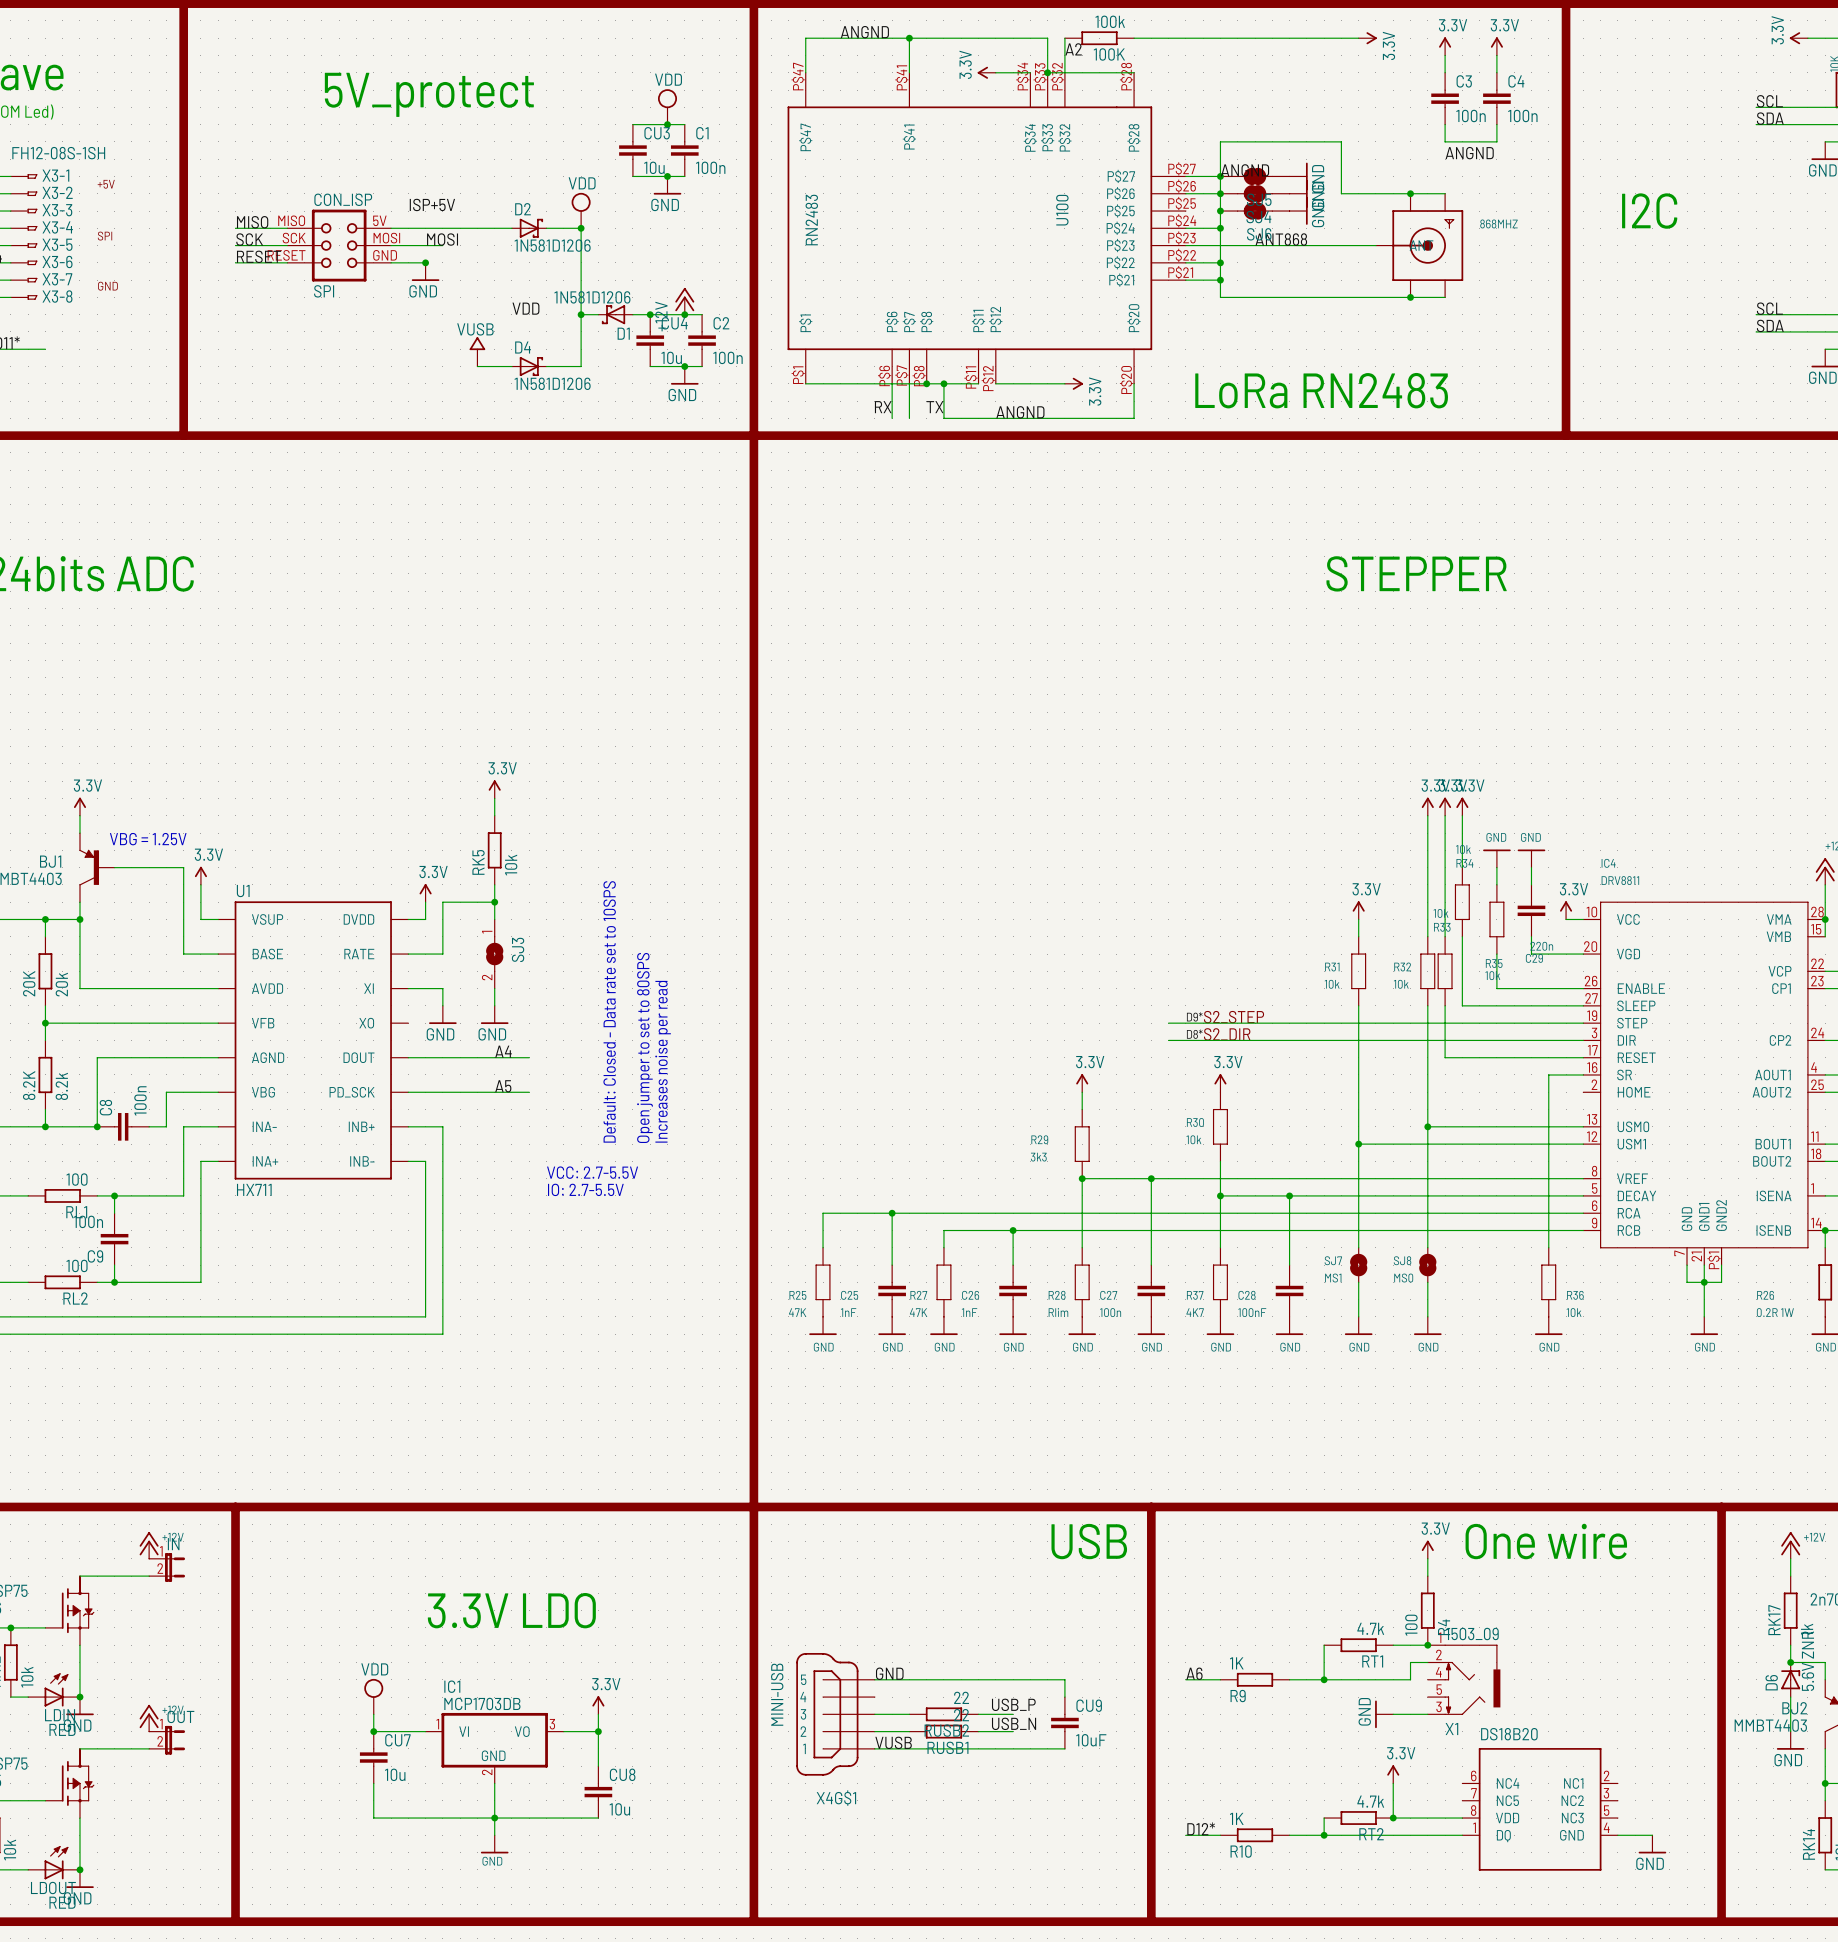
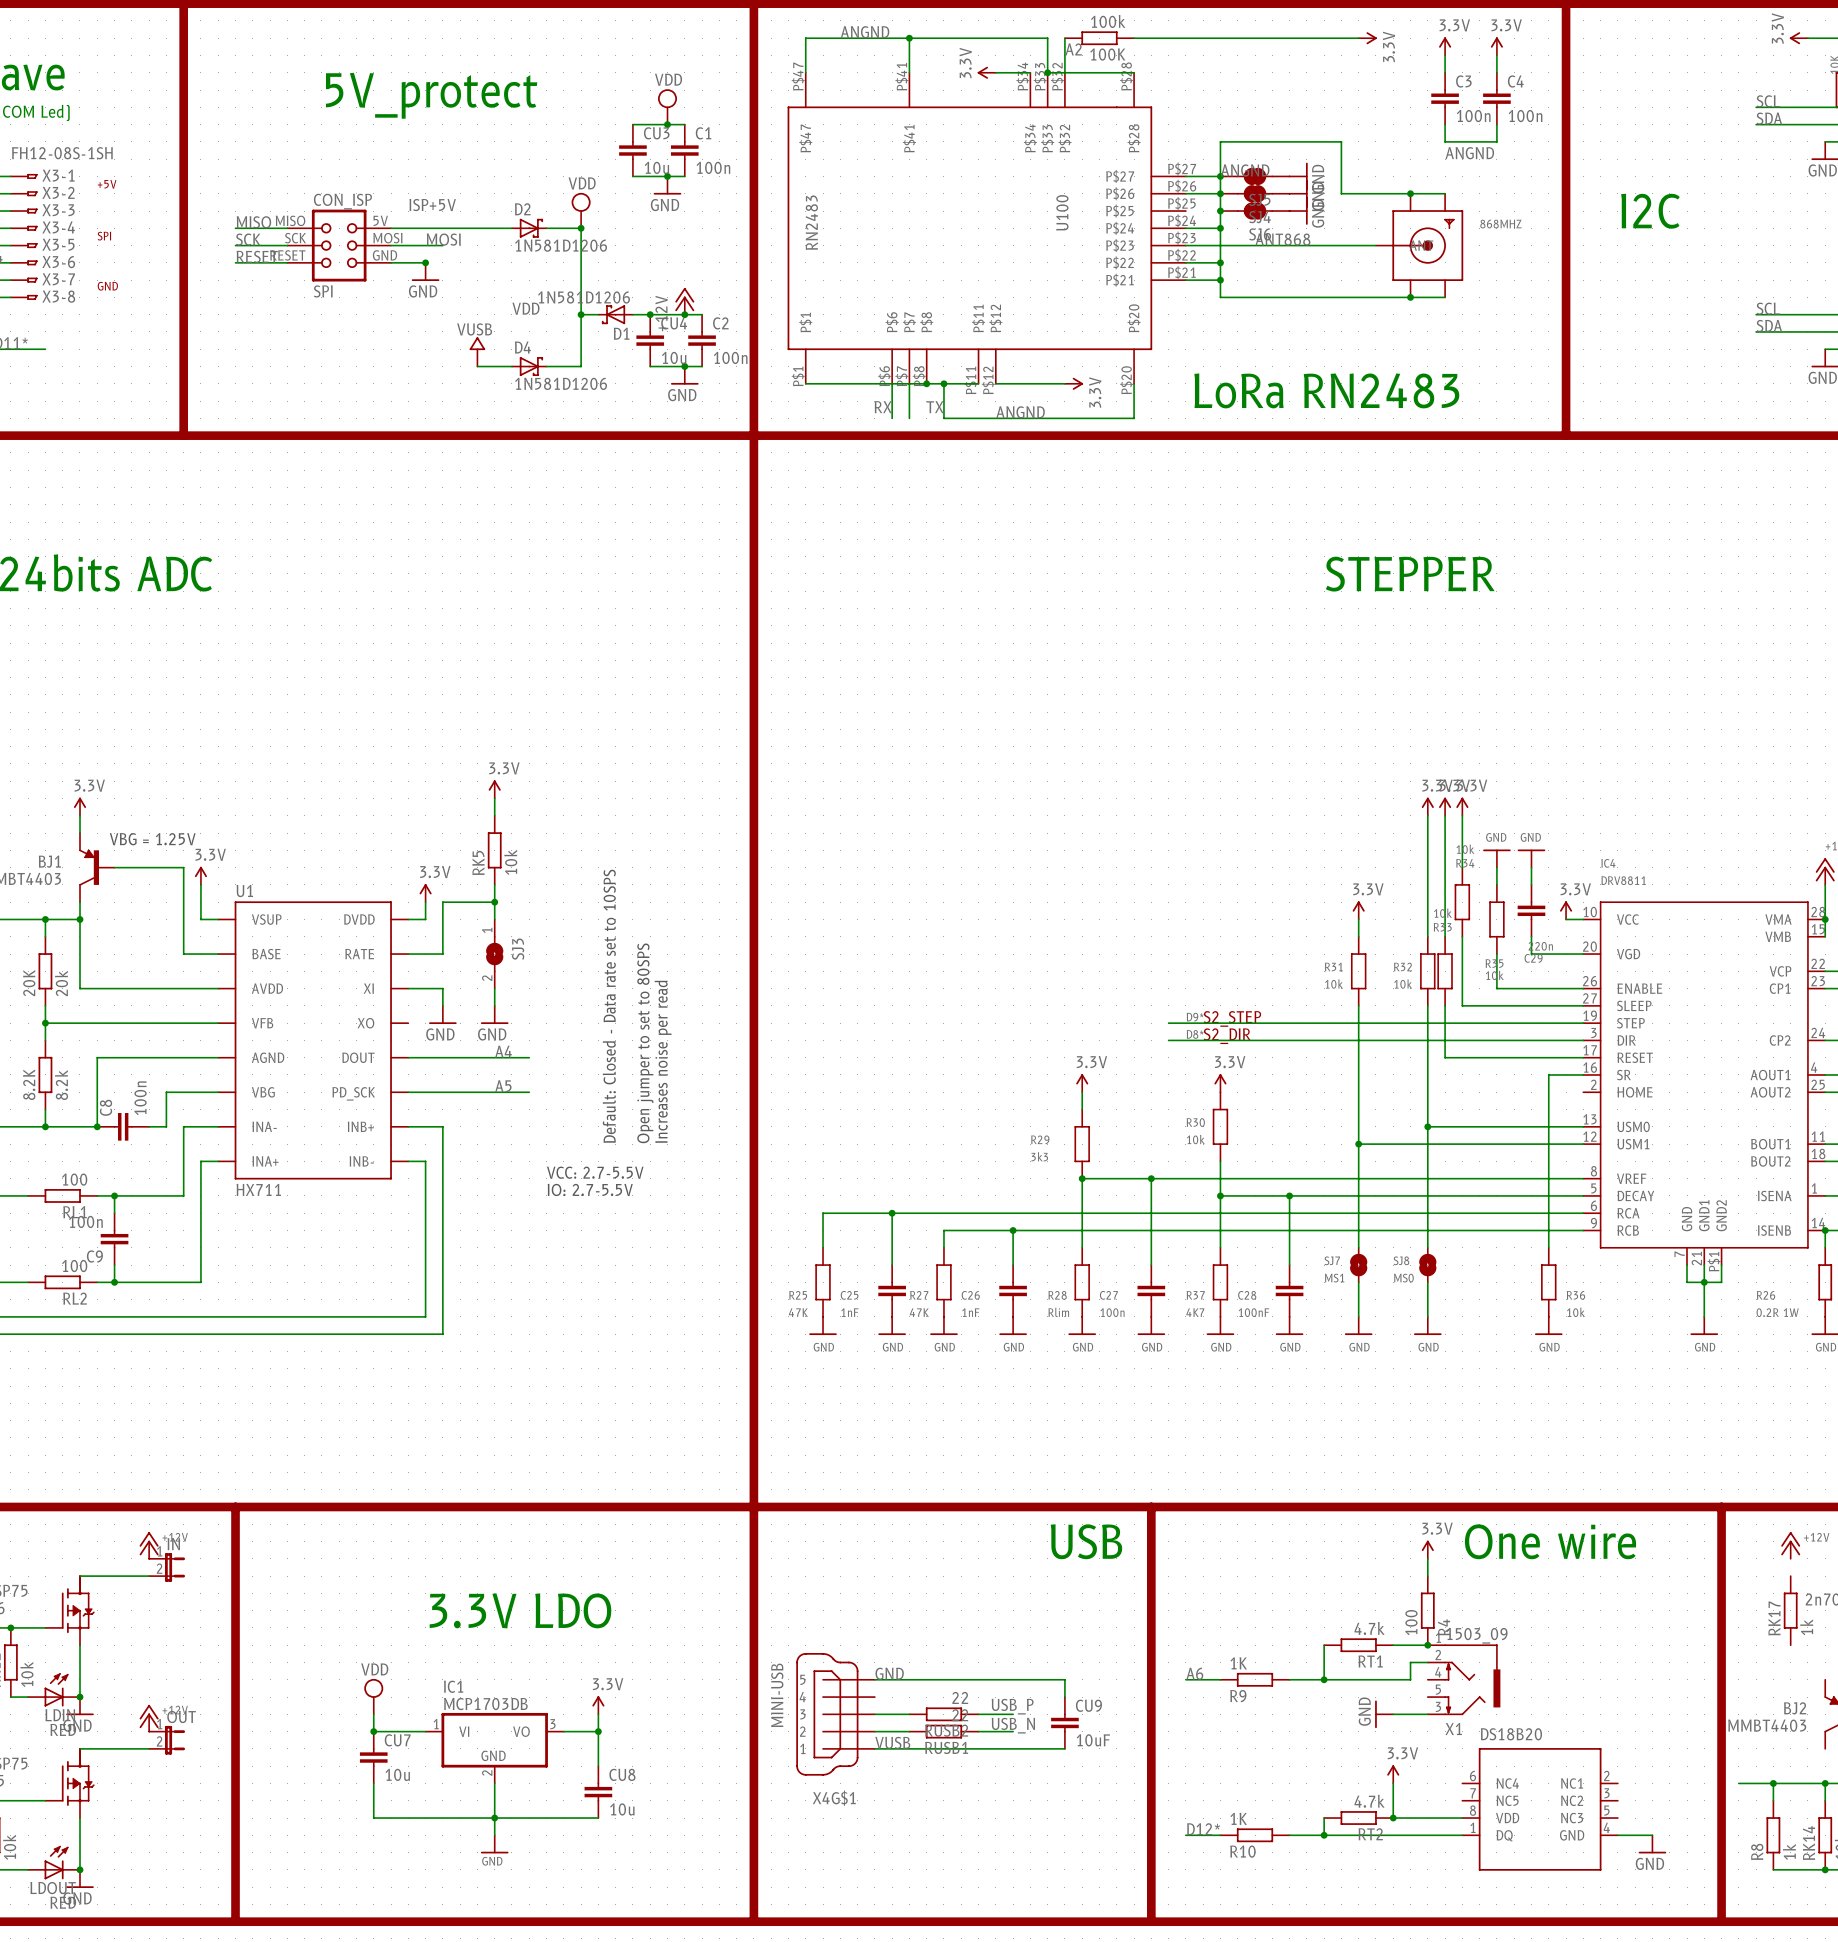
wire: (1790, 1558) (1790, 1576) -> none
wire: (1790, 1645) (1790, 1662) (1825, 1662) (1825, 1679) -> none
junction: (1790, 1662) -> none
D6: 5.6V ZNR (1790, 1679) -> none
wire: (1790, 1697) (1790, 1731) -> none
power symbol: GND (1790, 1740) -> none
wire: (1825, 1748) (1825, 1783) -> (1738, 1783) (1825, 1783)
wire: none -> (1773, 1783) (1773, 1800)
junction: none -> (1773, 1783)
R8: none -> 1k (1773, 1835)
wire: none -> (1773, 1869) (1825, 1869)
junction: none -> (1825, 1869)

